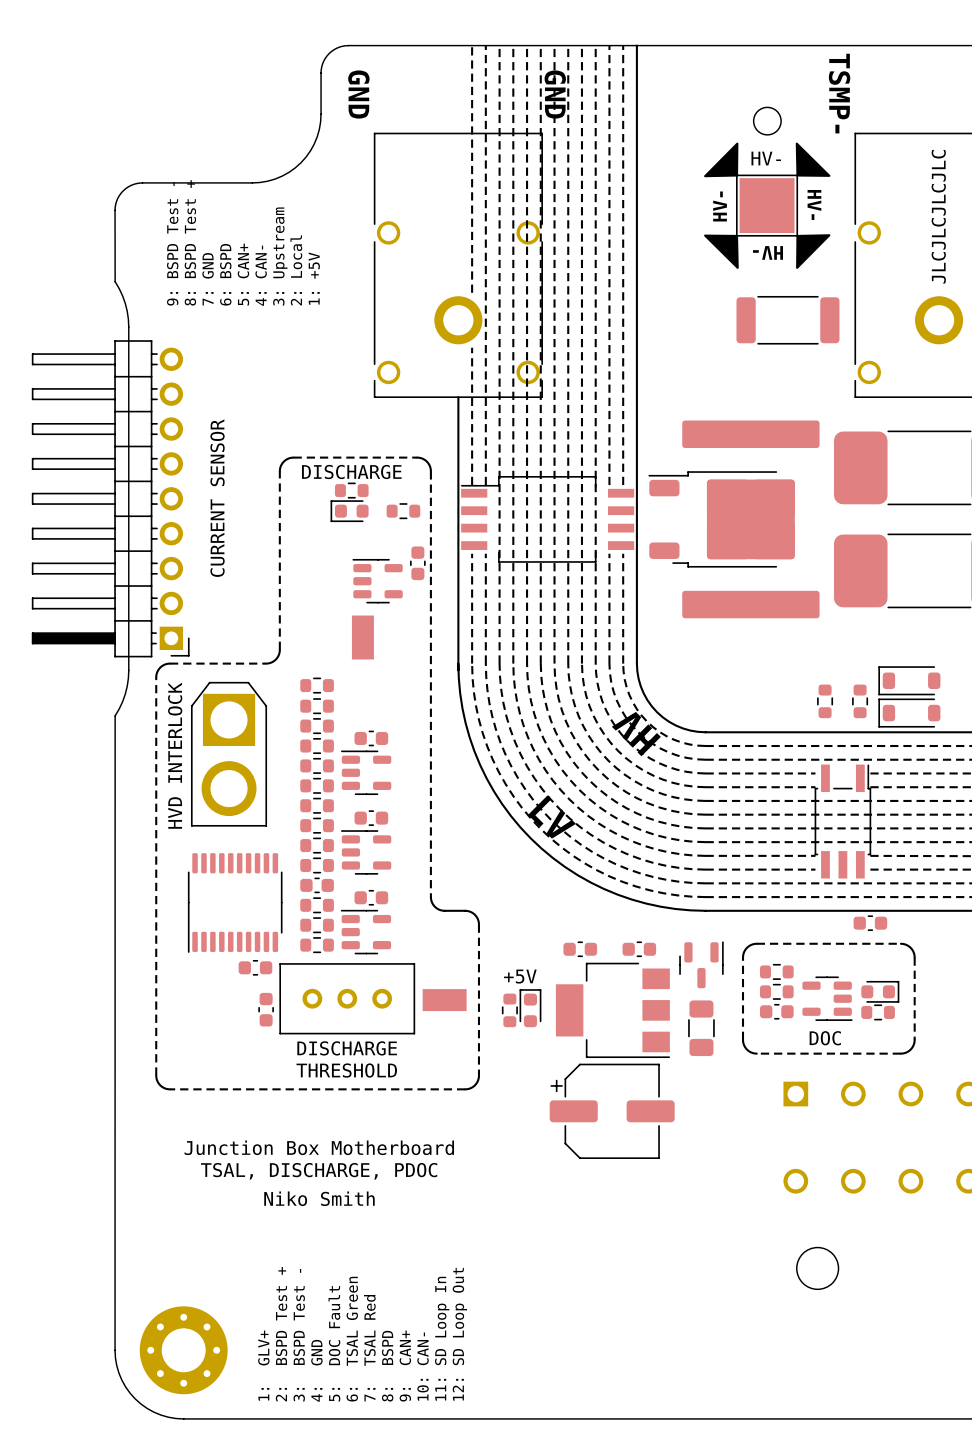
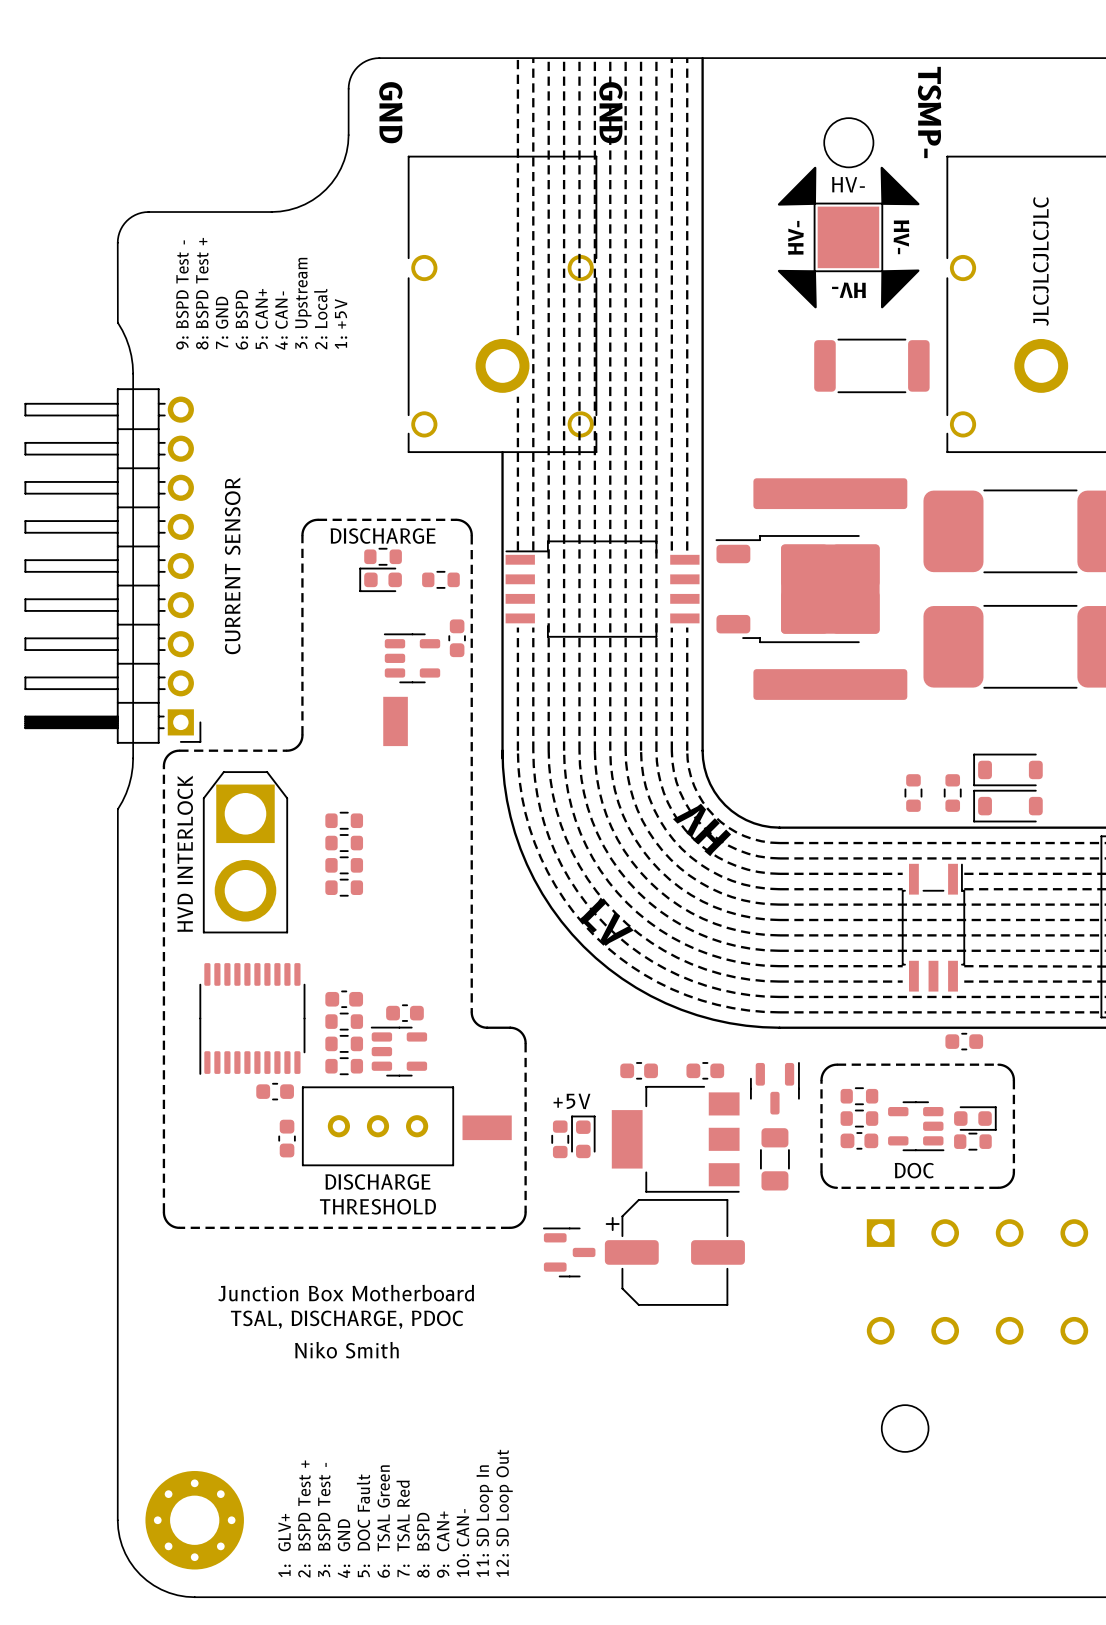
round board edge size: [752, 106, 782, 136] -> [823, 117, 875, 169]
part: (317, 685) -> none
part: (317, 706) -> none
part: (371, 738) -> none
part: (366, 772) -> none
part: (317, 805) -> none
part: (371, 818) -> none
part: (317, 825) -> none
part: (317, 845) -> none
part: (366, 852) -> none
part: (317, 865) -> none
part: none -> (569, 1252)

